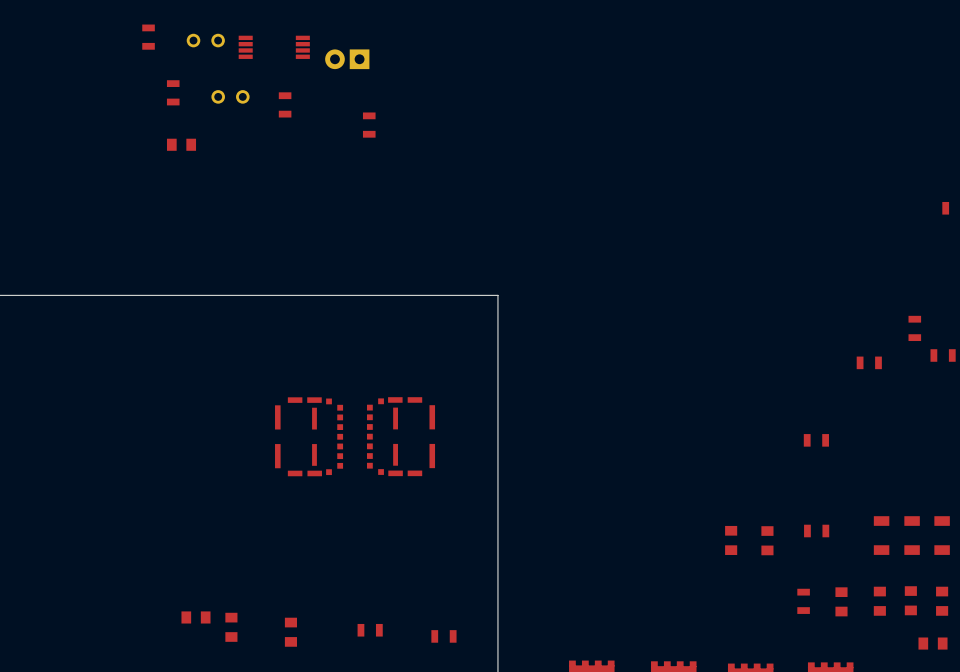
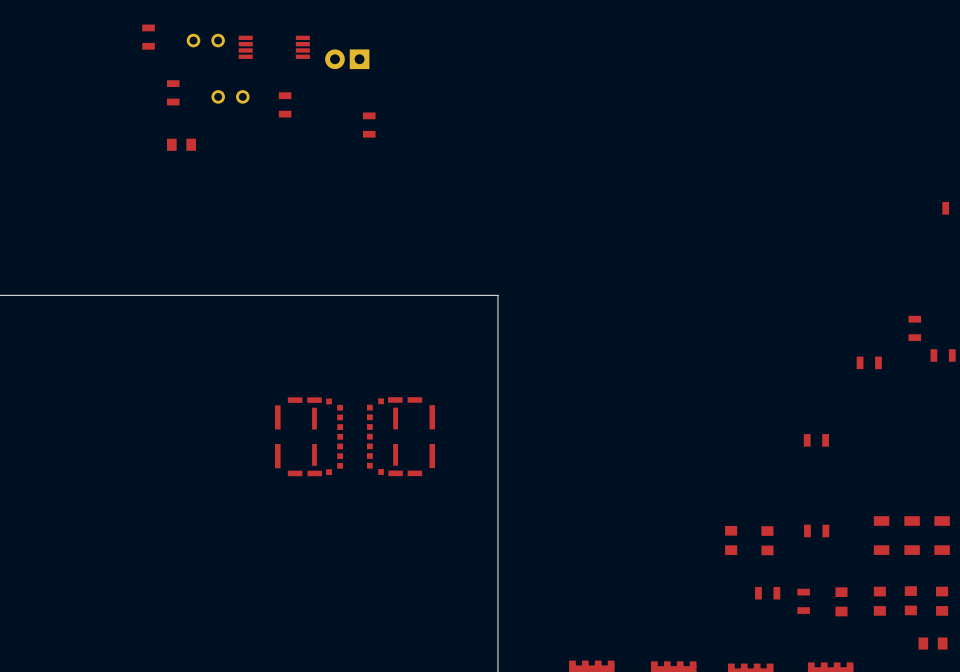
part: none -> (767, 593)
part: (195, 617) -> none
part: (231, 627) -> none
part: (370, 630) -> none
part: (290, 632) -> none
part: (443, 636) -> none

